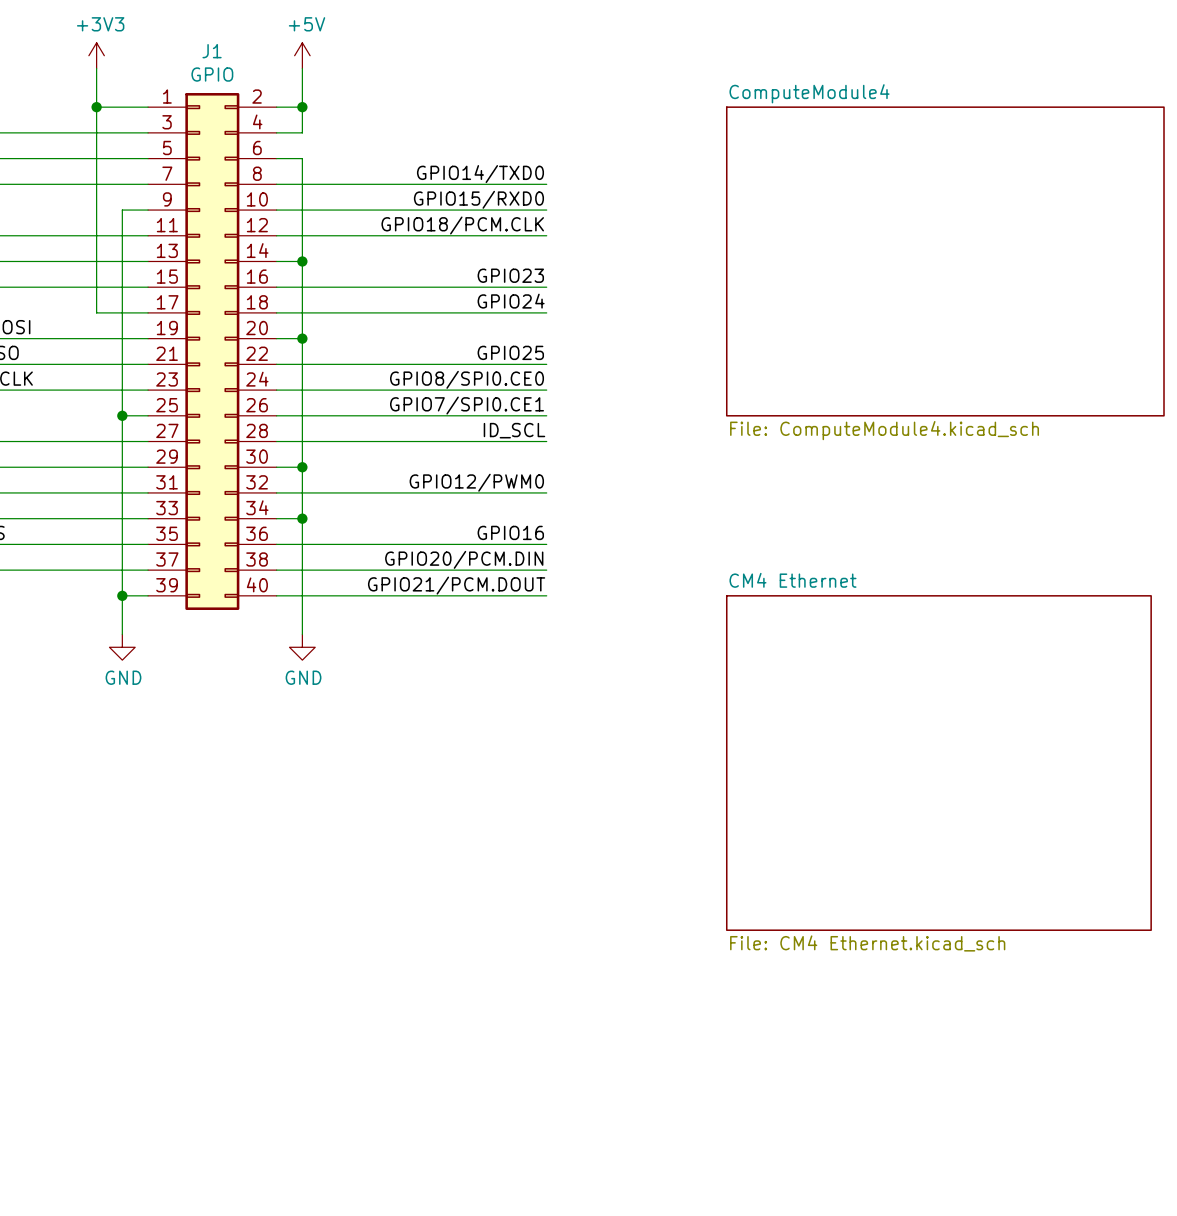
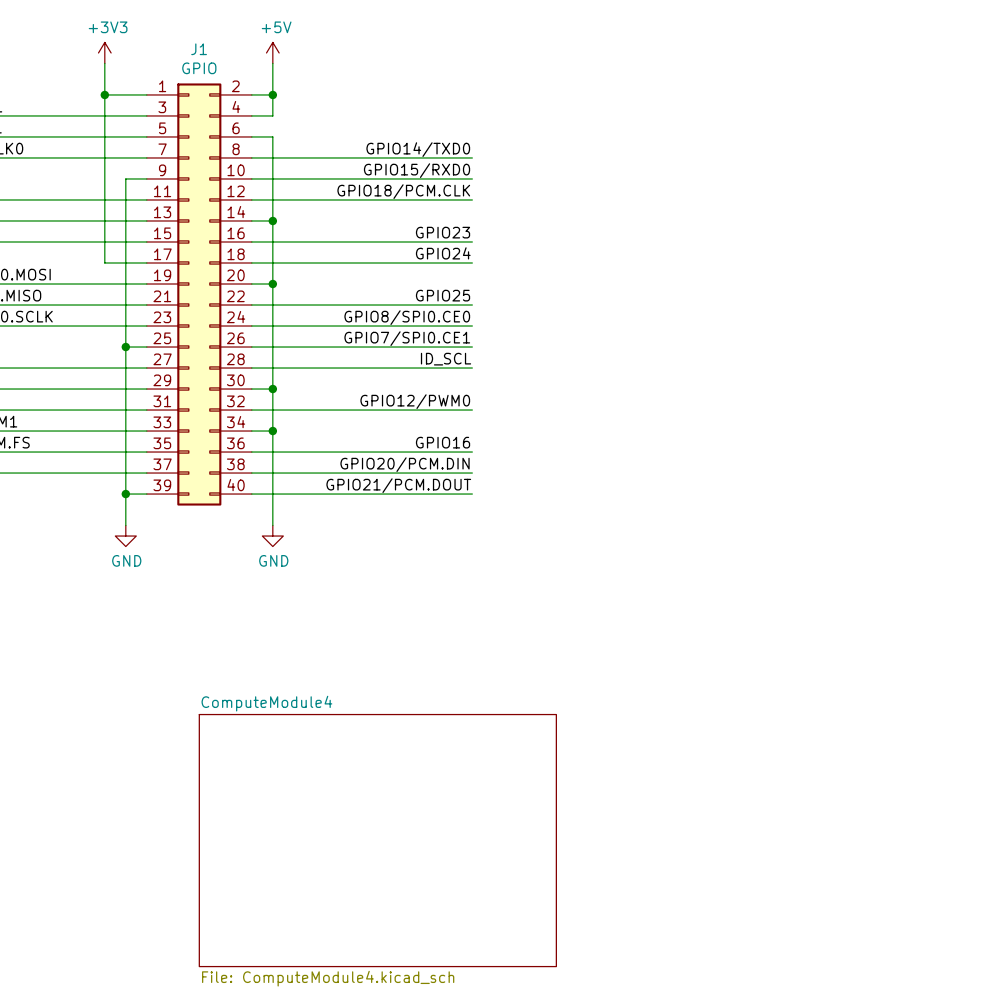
sheet ComputeModule4 position: (945, 261) -> (377, 840)
sheet CM4 Ethernet: File: CM4 Ethernet.kicad_sch (938, 763) -> none

